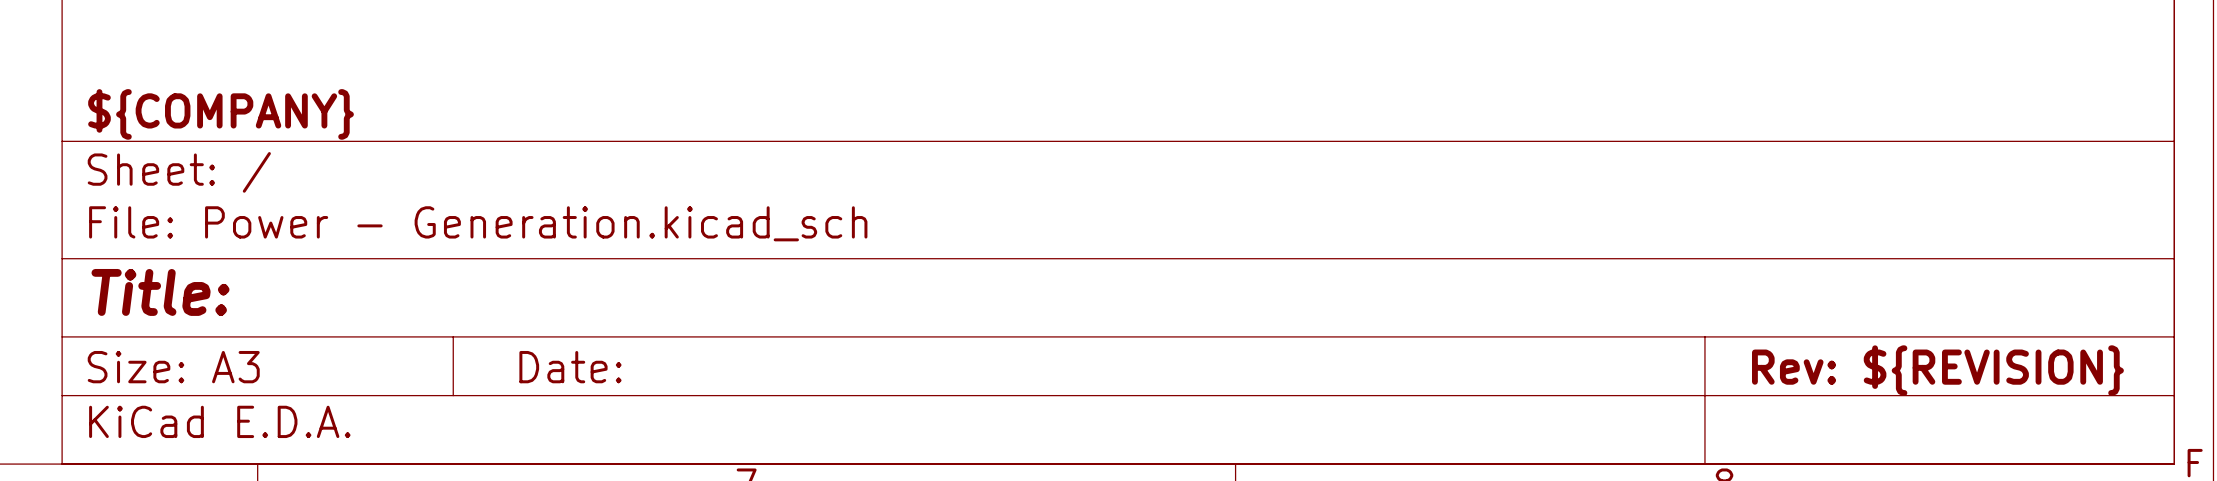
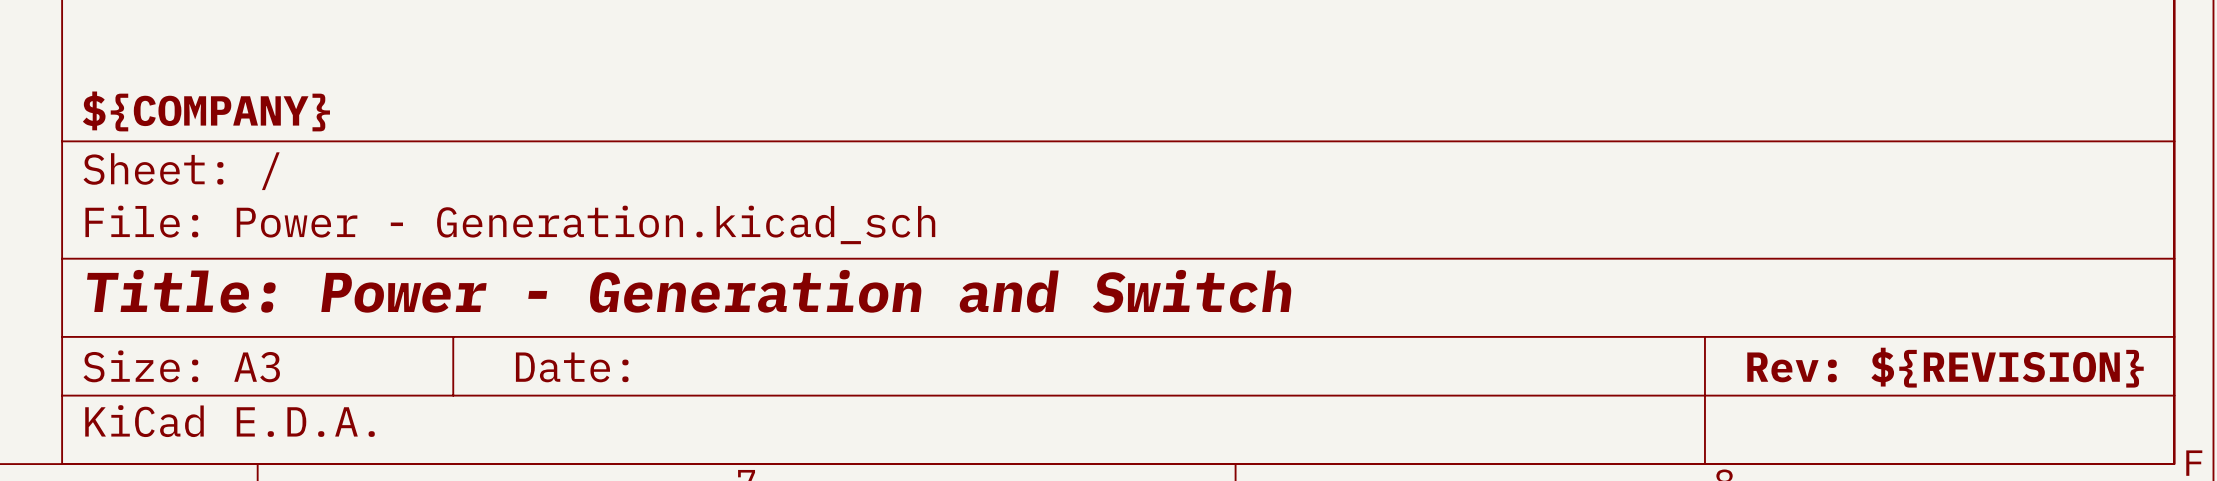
title block: Title: (160, 292) -> Title: Power - Generation and Switch (689, 291)

